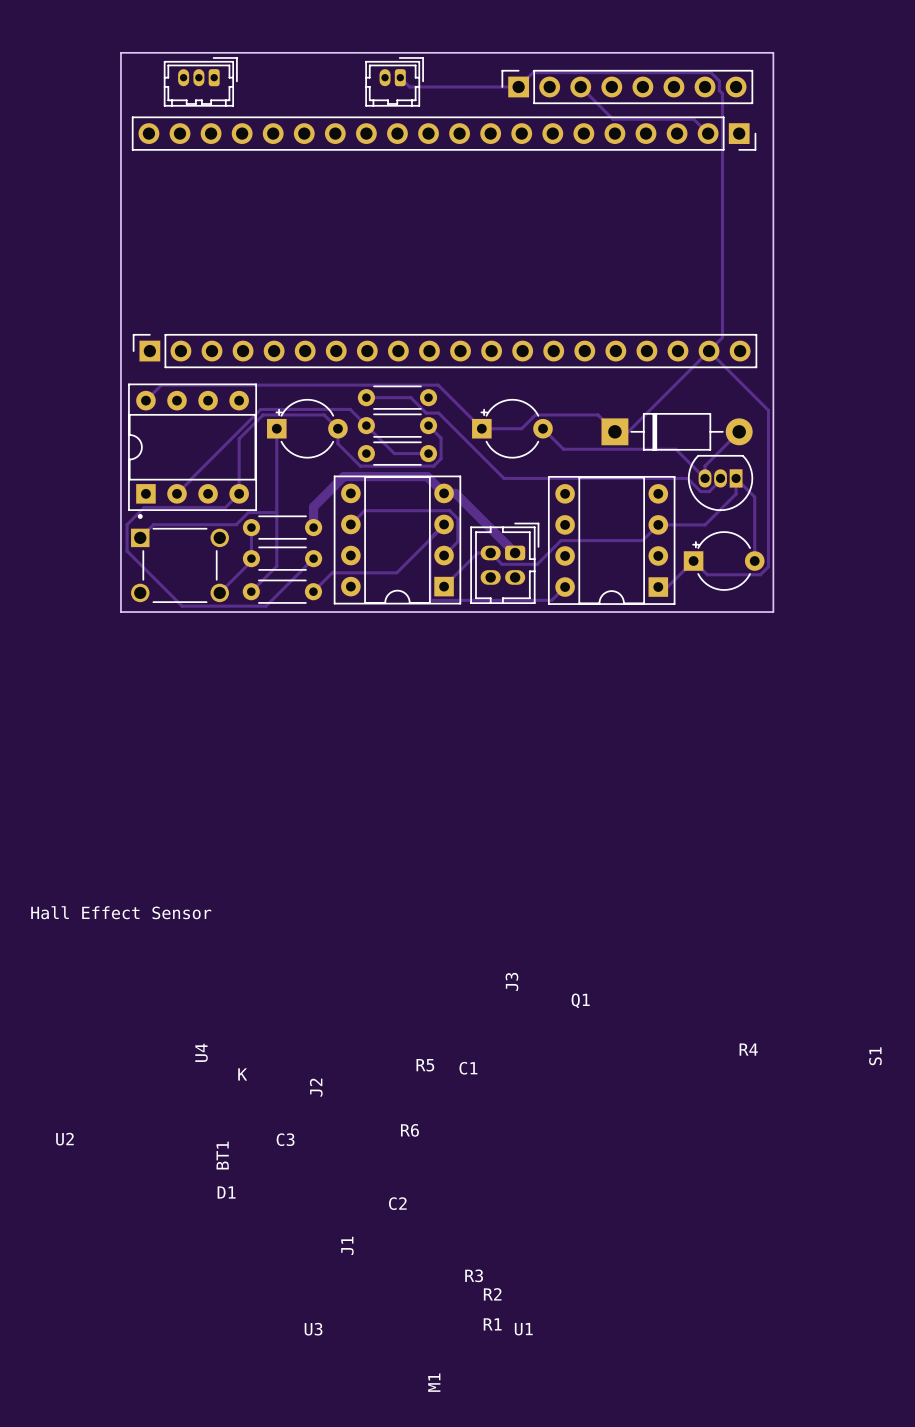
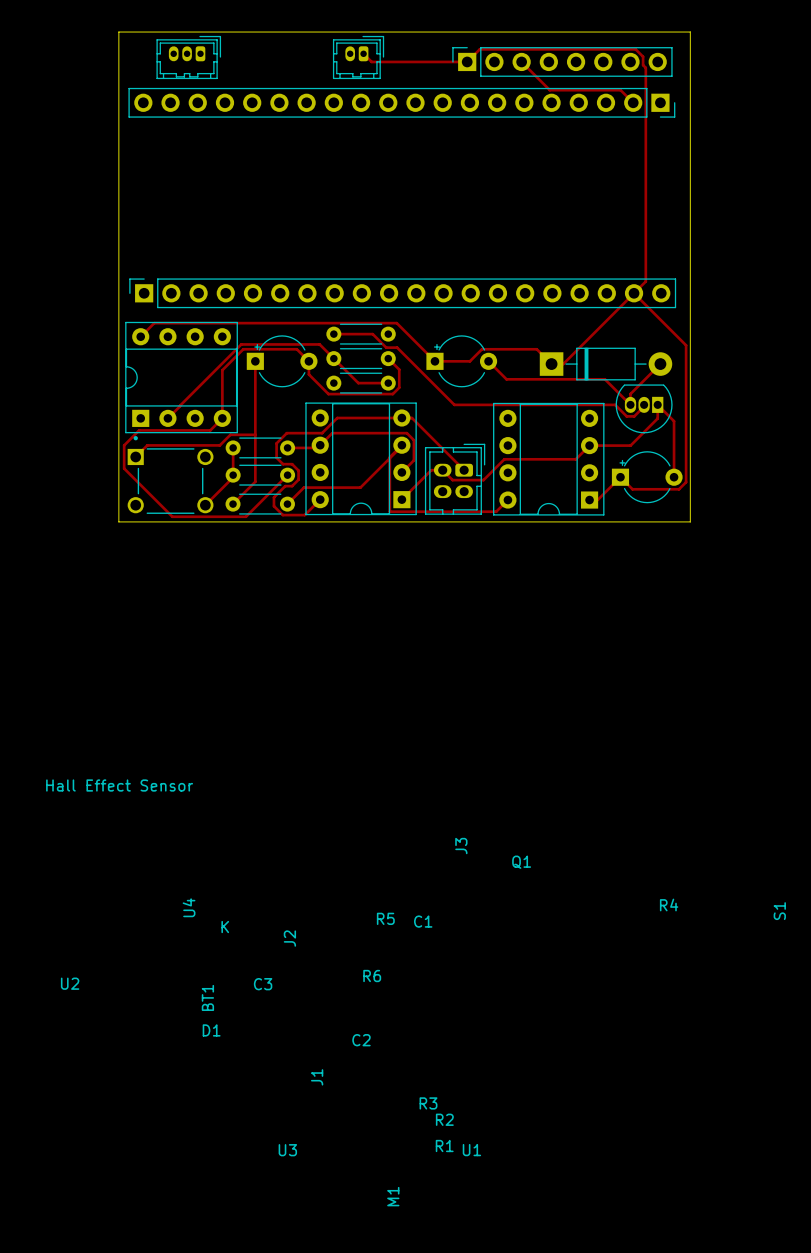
track: (444, 493) (427, 476) (343, 476) (313, 506) (313, 527) (306, 527) -> (401, 418) (337, 418) (322, 433) (286, 433) (276, 443) (276, 457) (283, 464) (292, 464) (298, 470) (298, 479) (292, 486) (285, 486) (273, 497) (273, 506) (282, 515) (304, 515) (320, 499)
track width: thick (444, 493) (455, 493) (515, 552) -> thin (401, 418) (411, 418) (464, 470)
track: none -> (287, 447) (317, 447)

